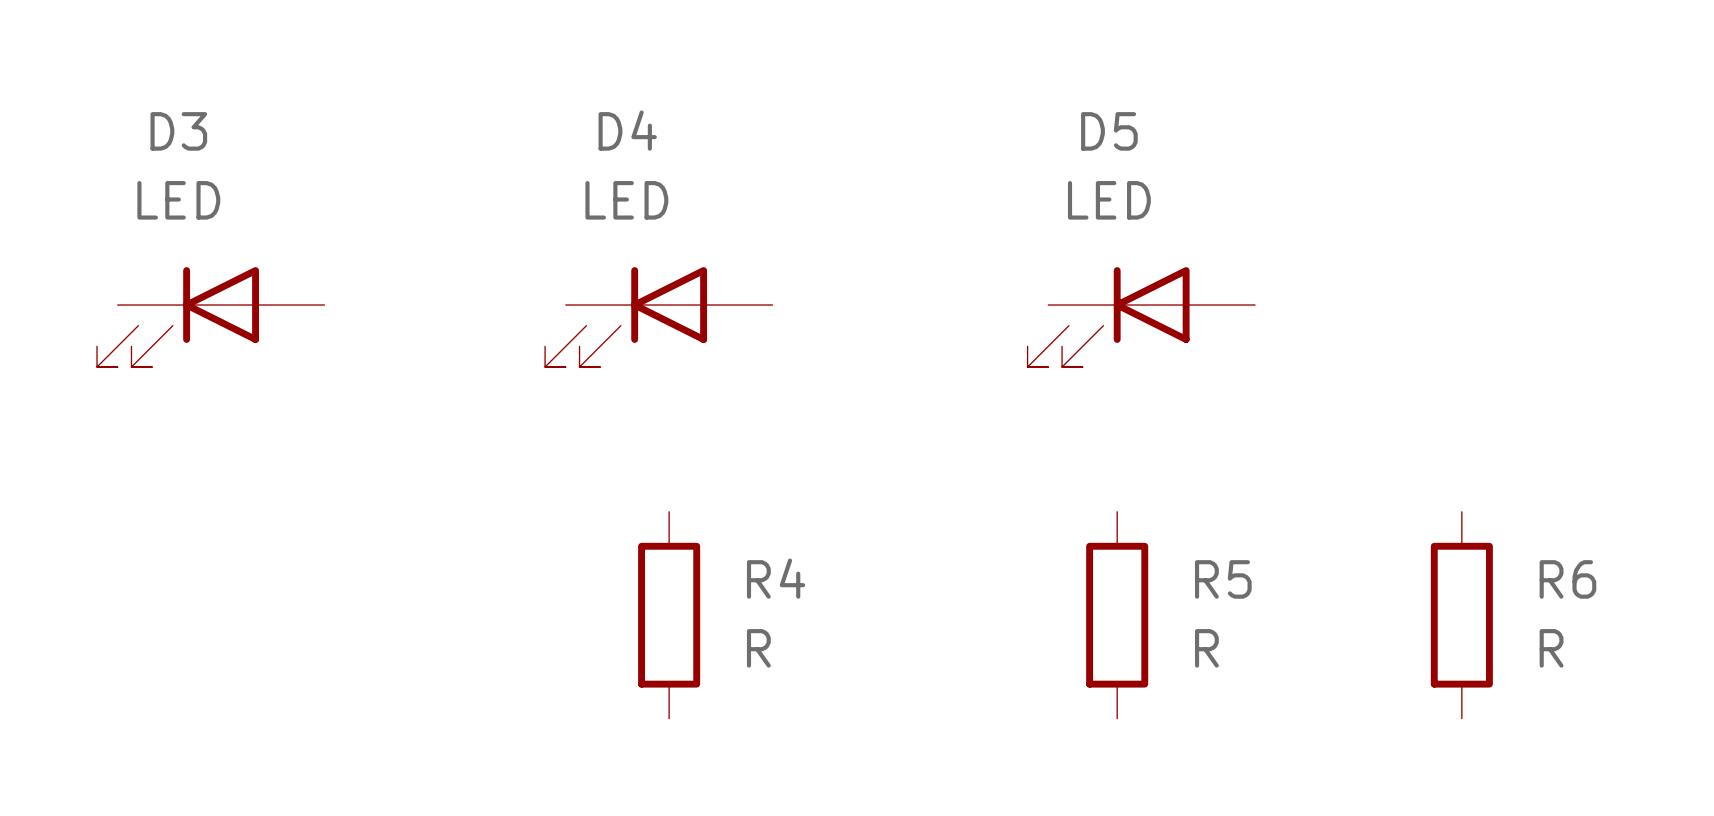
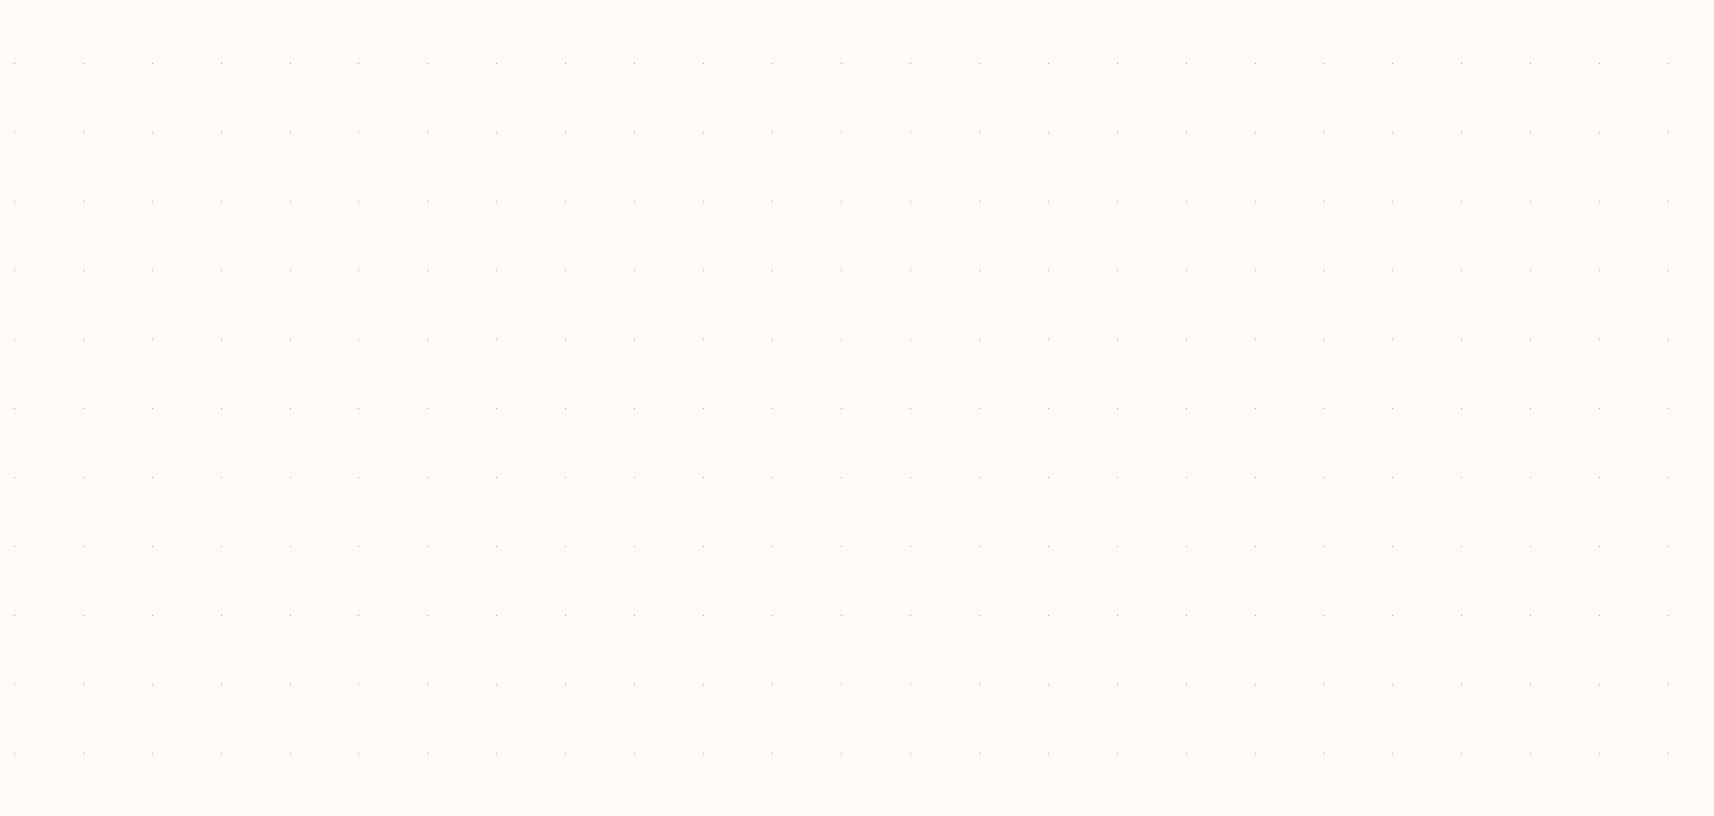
D3: LED (210, 317) -> none
D4: LED (658, 317) -> none
D5: LED (1141, 317) -> none
R4: R (669, 615) -> none
R5: R (1117, 615) -> none
R6: R (1461, 615) -> none

